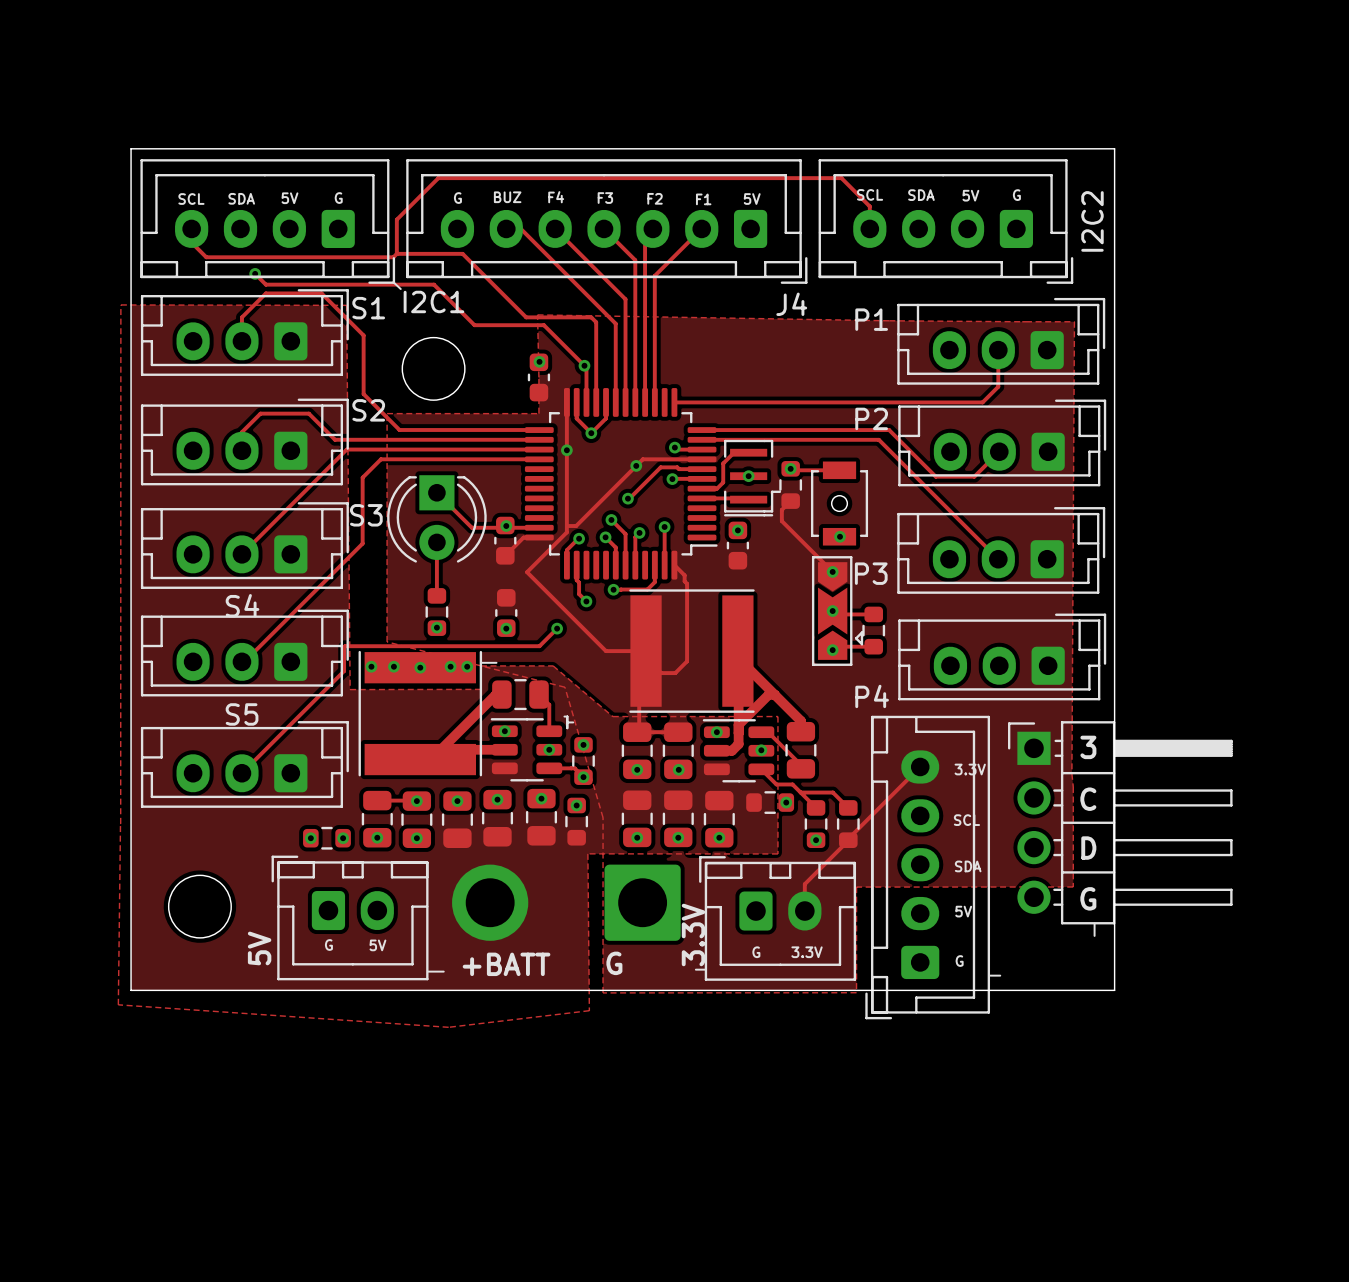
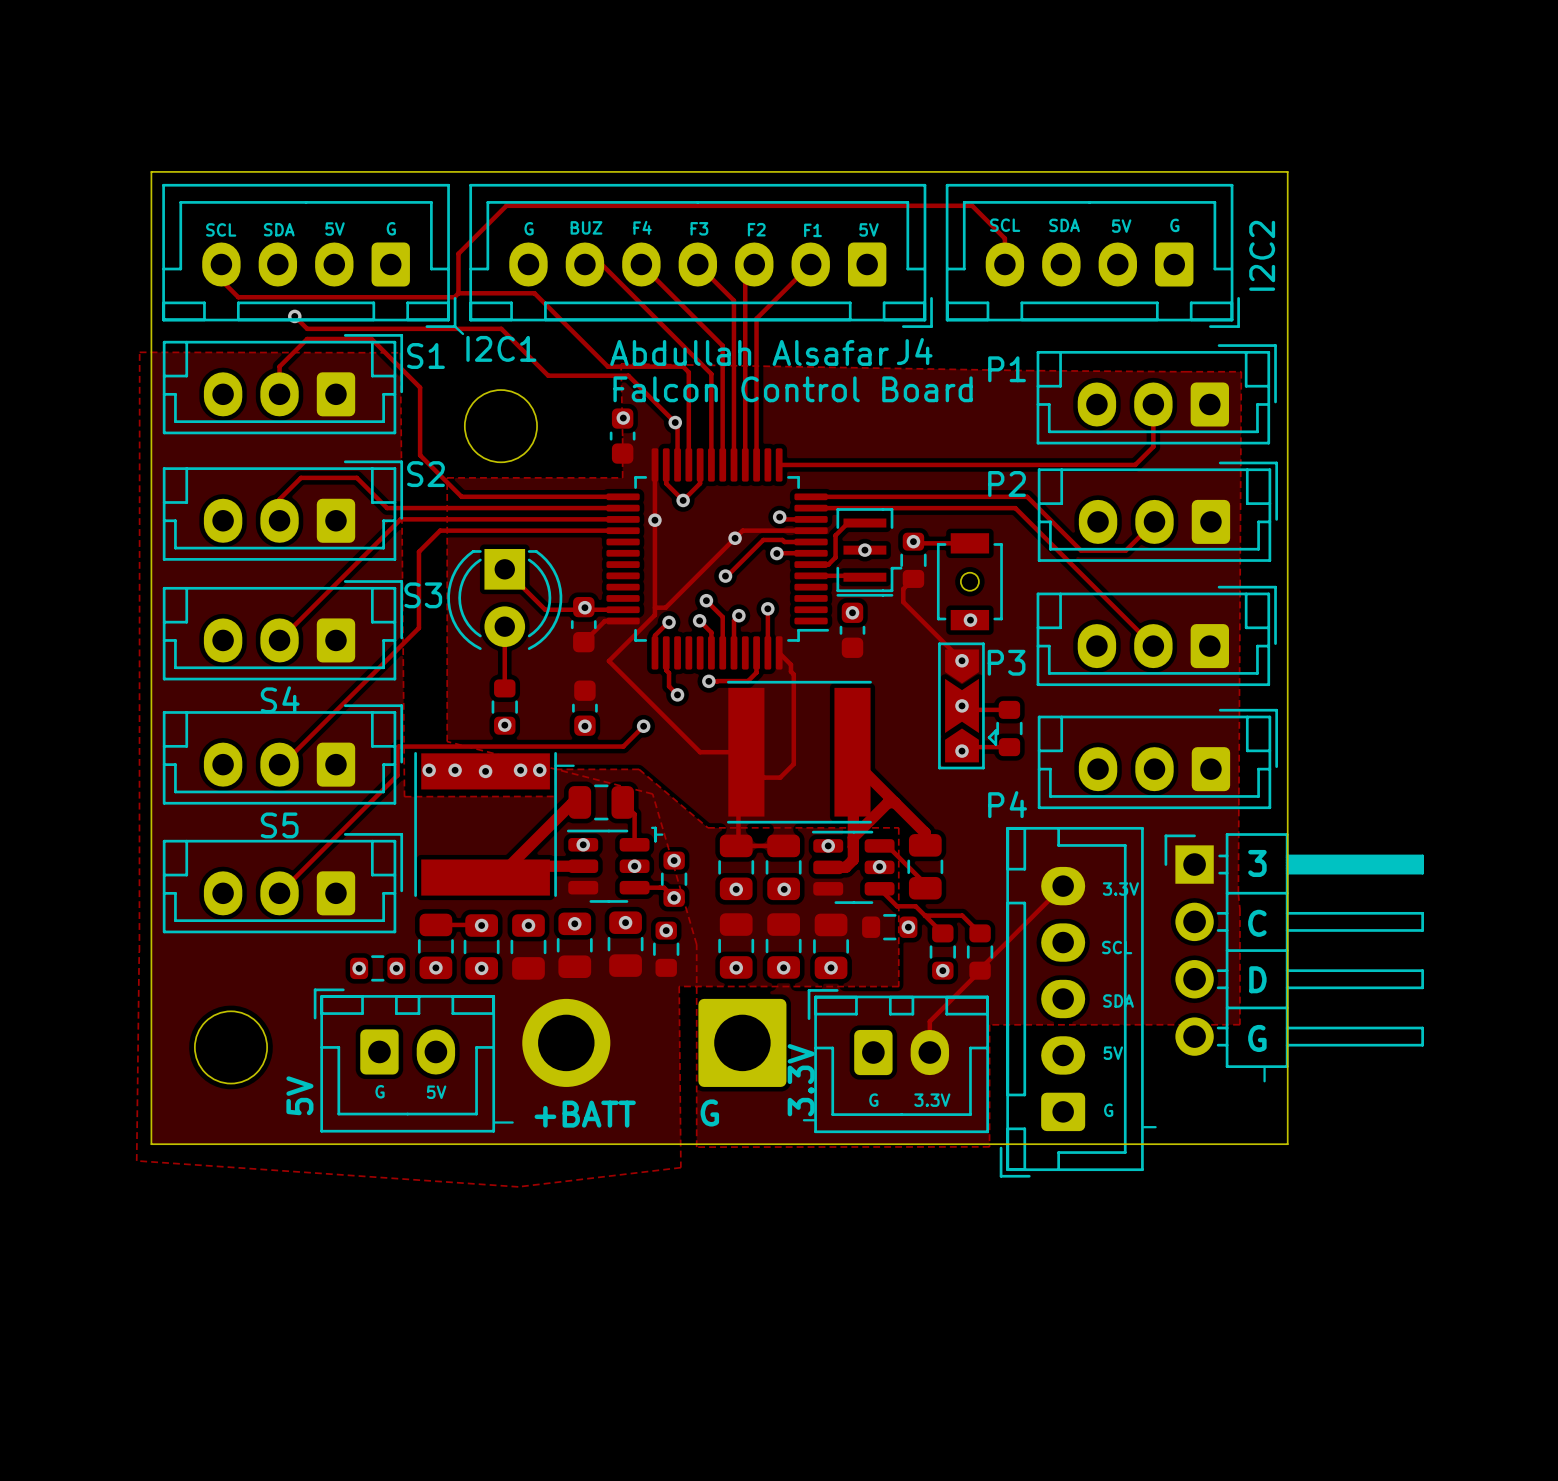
text: none -> Abdullah Alsafar (749, 352)
text: none -> Falcon Control Board (793, 389)

